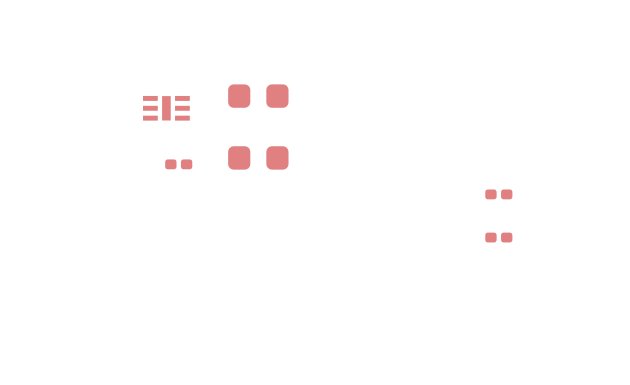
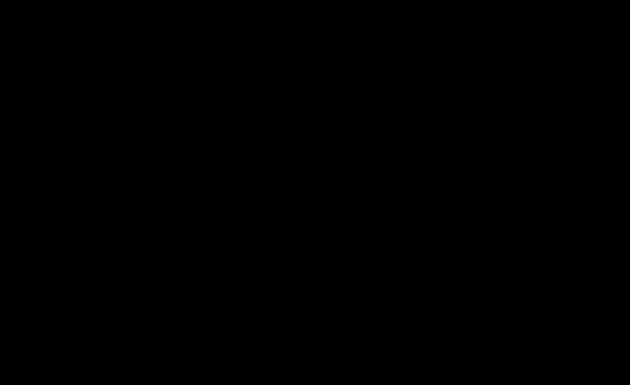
part: (258, 96) -> none
part: (166, 108) -> none
part: (258, 157) -> none
part: (178, 164) -> none
part: (498, 194) -> none
part: (498, 237) -> none

